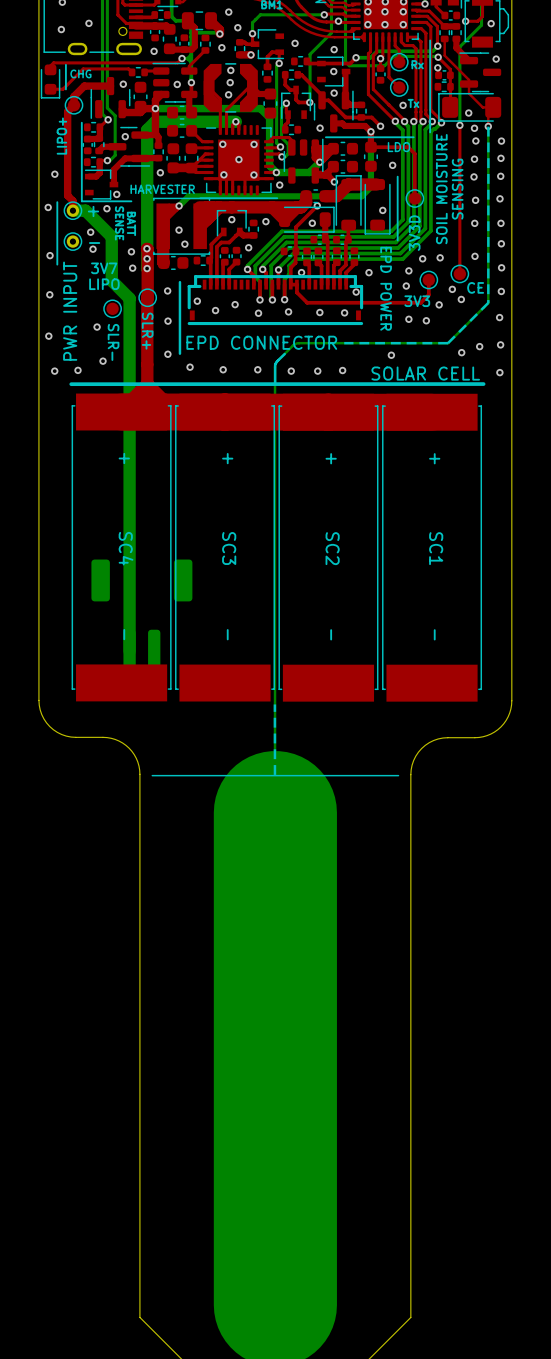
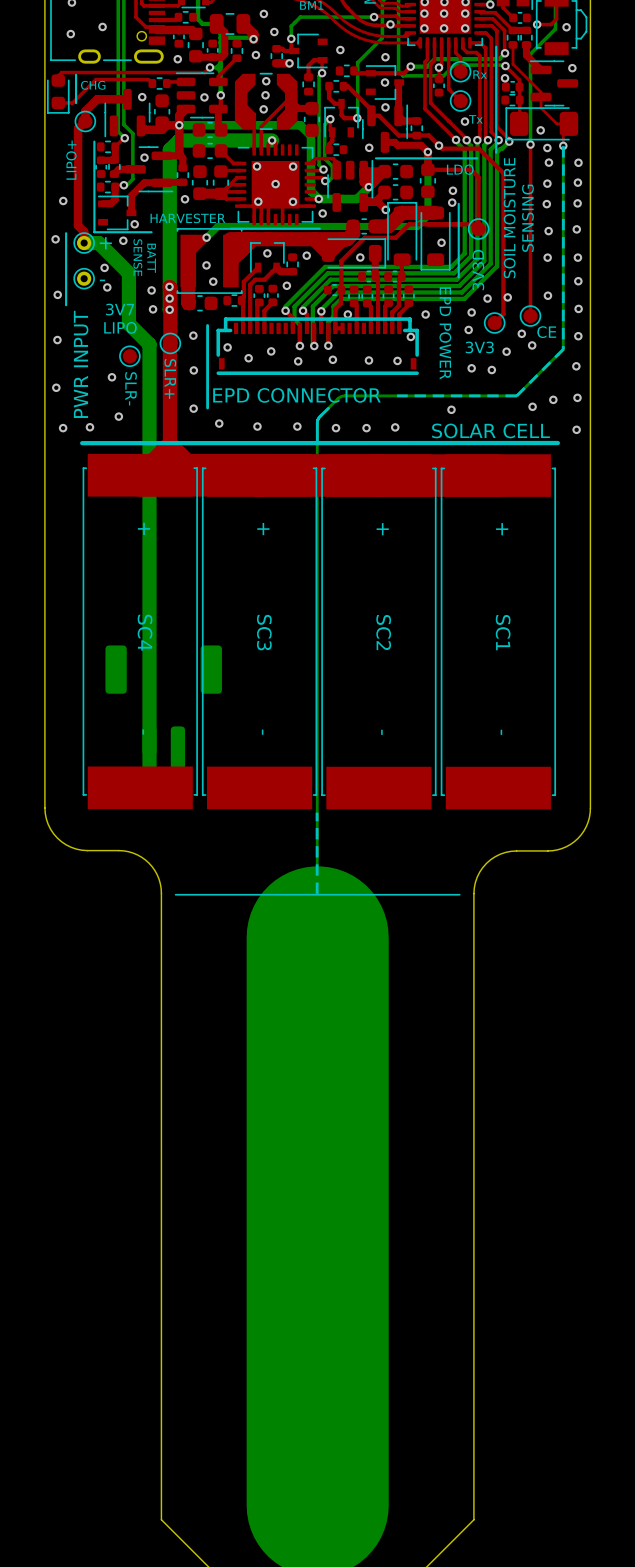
top track: none -> (438, 145) (441, 148) (478, 148) (503, 173) (503, 314) (494, 323)
via: none -> (452, 202)
top track: (317, 205) (295, 227) -> (478, 224) (409, 224) (395, 237) (364, 237) (341, 262)
via: (317, 205) -> none
top track: (428, 280) (428, 294) (420, 302) (307, 302) (296, 292) (296, 284) -> none

